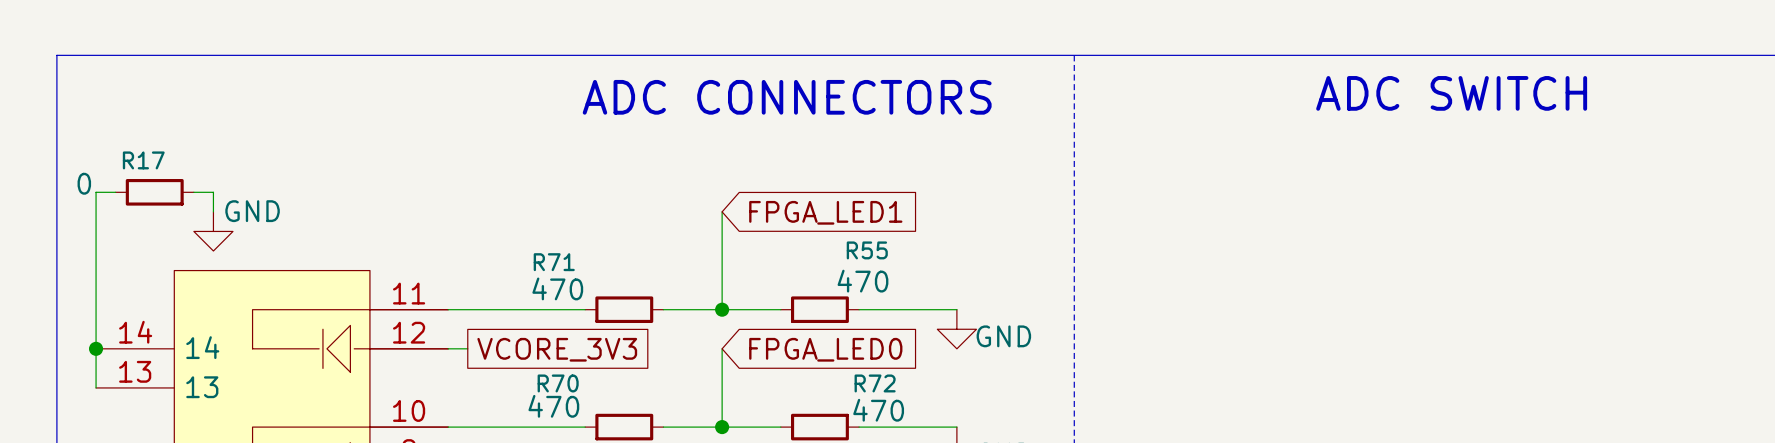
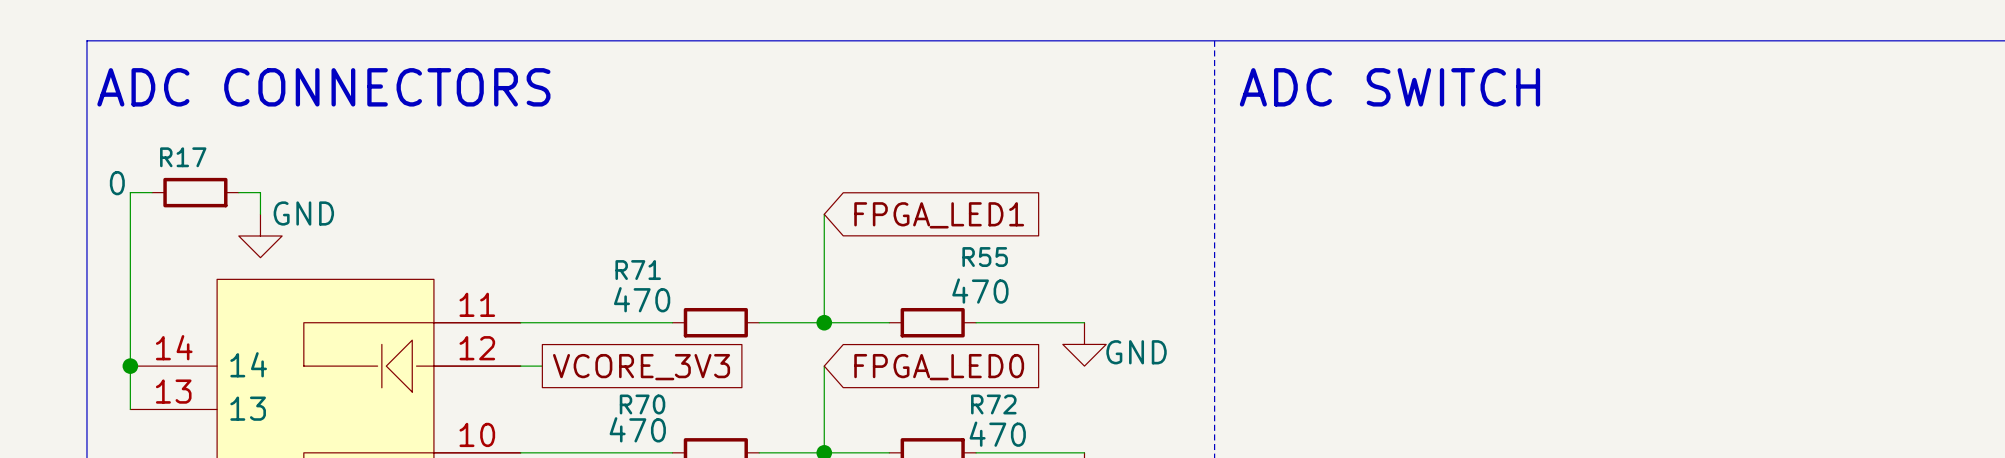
text position: ADC SWITCH (1451, 93) -> ADC SWITCH (1389, 87)
text: none -> ADC CONNECTORS (323, 87)
text: ADC CONNECTORS (787, 97) -> none

